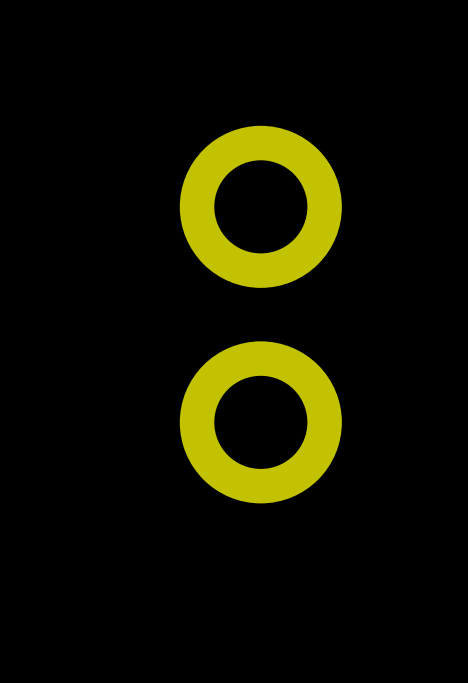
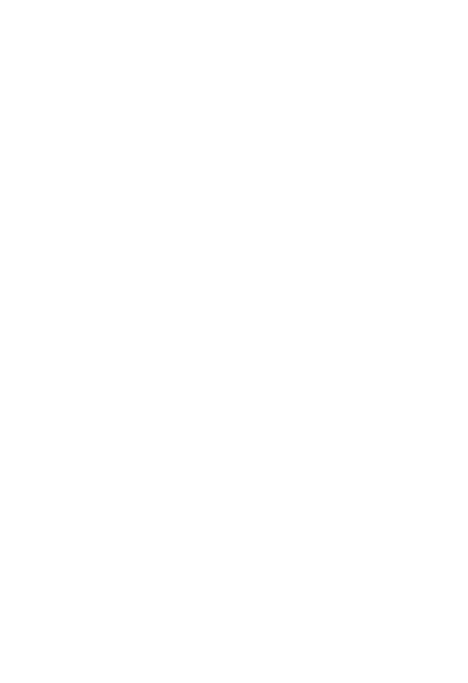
part: (260, 206) -> none
part: (260, 422) -> none

